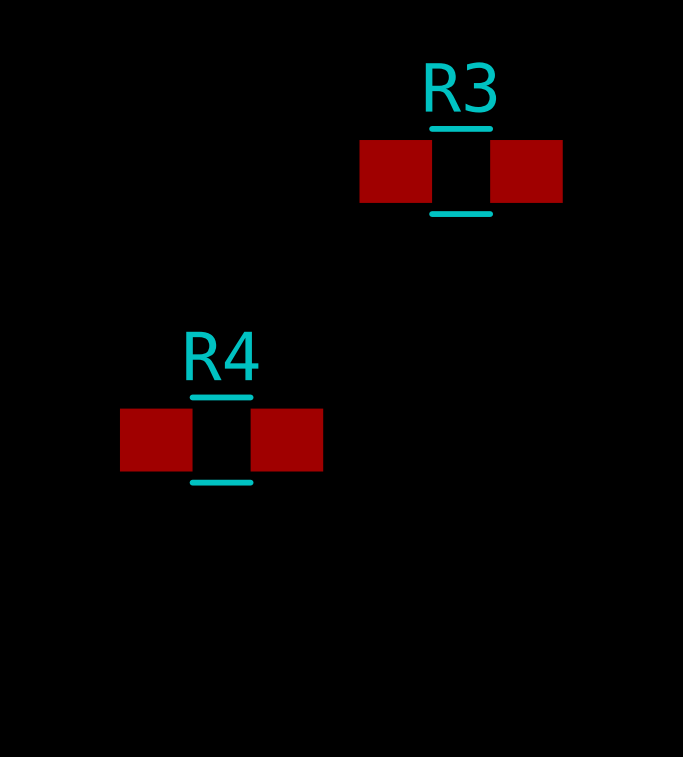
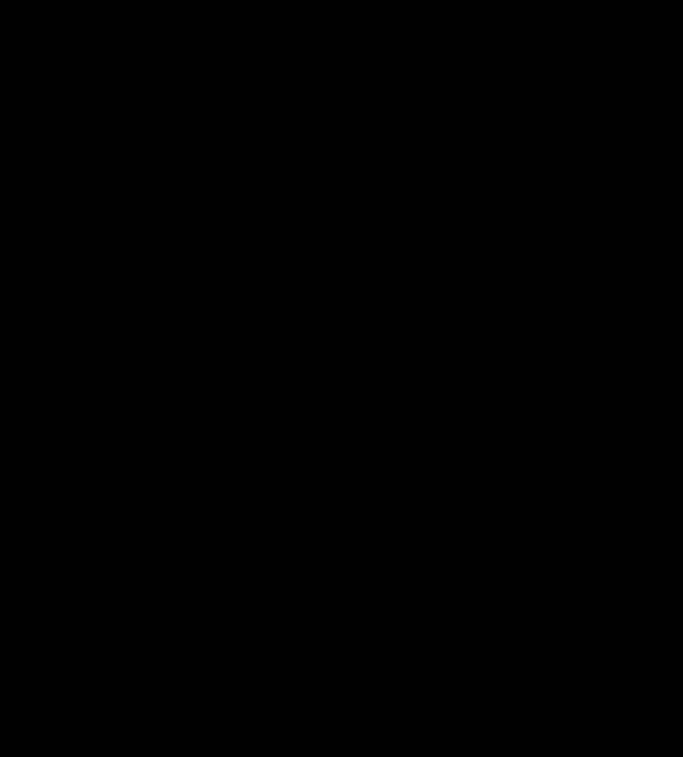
R3: (461, 171) -> none
R4: (221, 440) -> none

